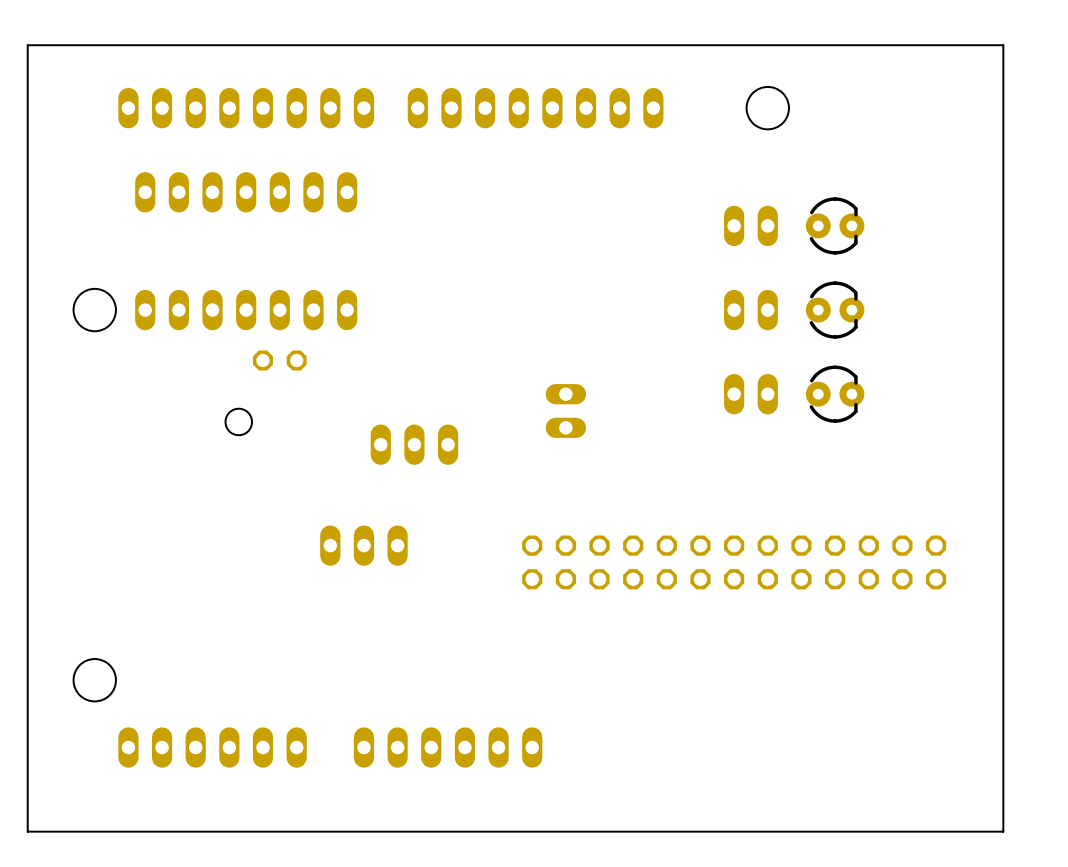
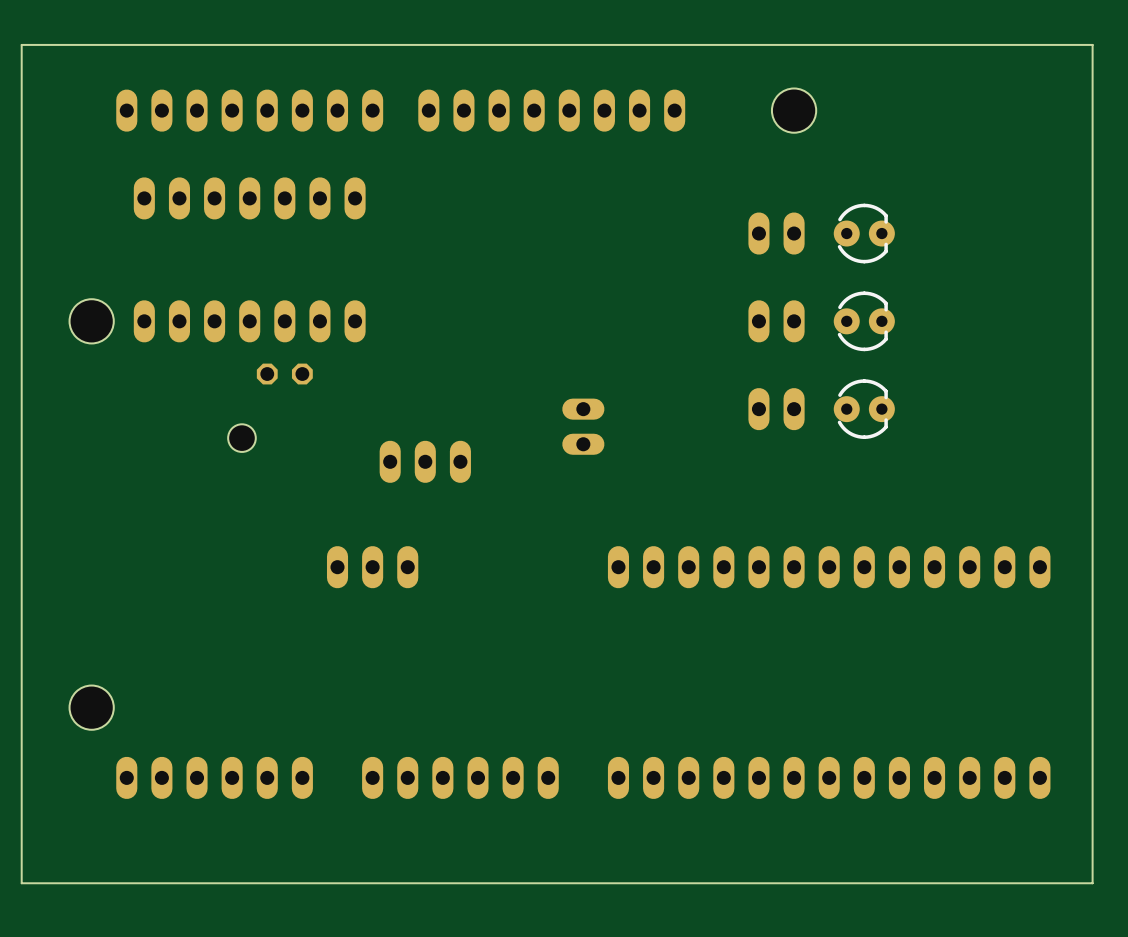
board edge: (1003, 45) (1003, 831) (27, 831) -> (1039, 44) (1092, 44) (1092, 883) (21, 883) (21, 865)
part: none -> (829, 567)
part: (734, 562) -> none
part: none -> (829, 777)

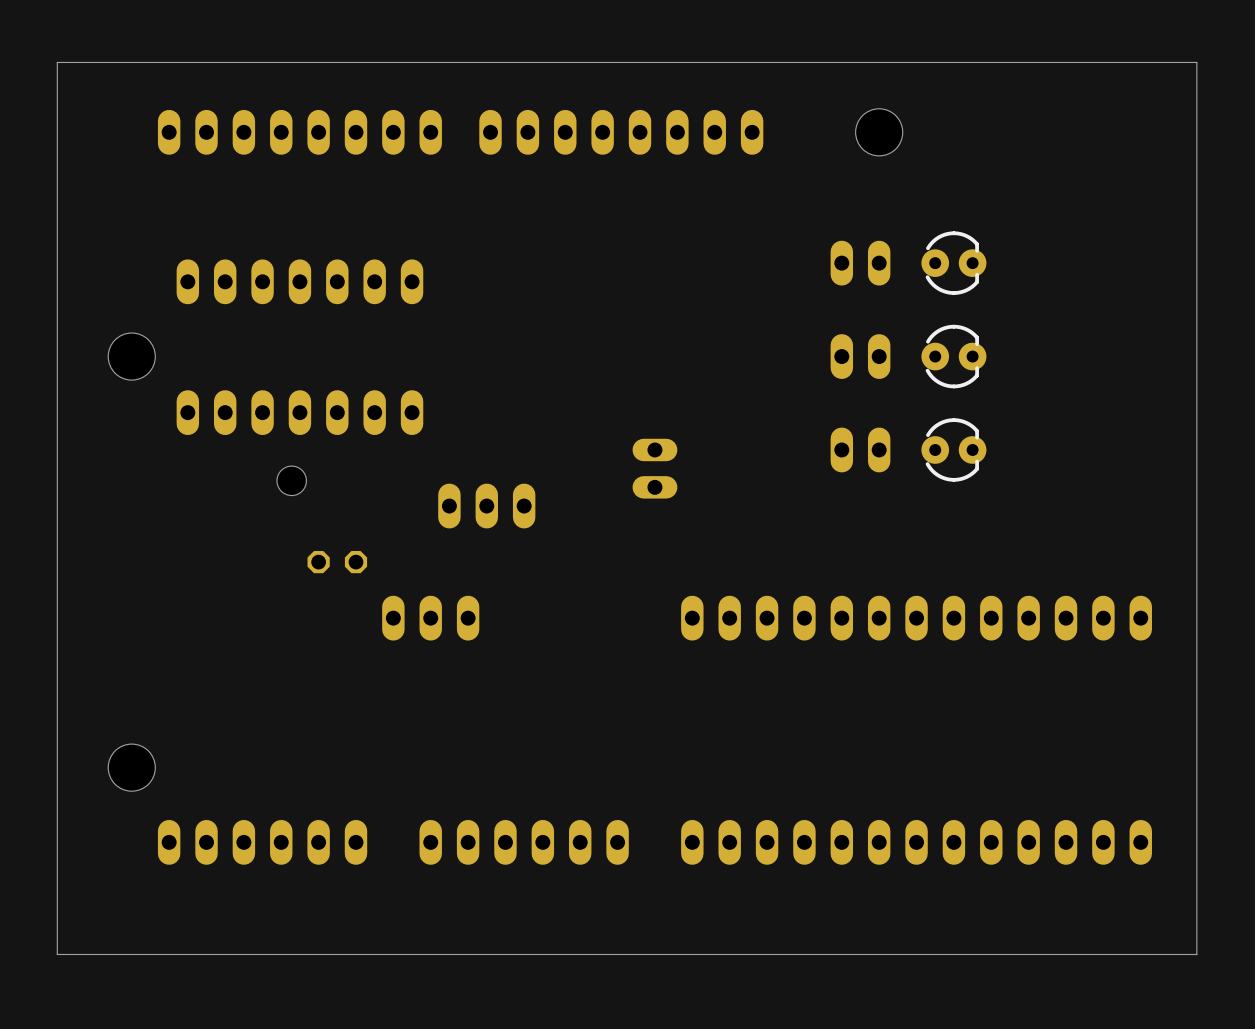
part: (249, 198) -> none
part: none -> (299, 281)
part: (249, 321) -> none
part: none -> (299, 412)
part position: (284, 374) -> (337, 562)

